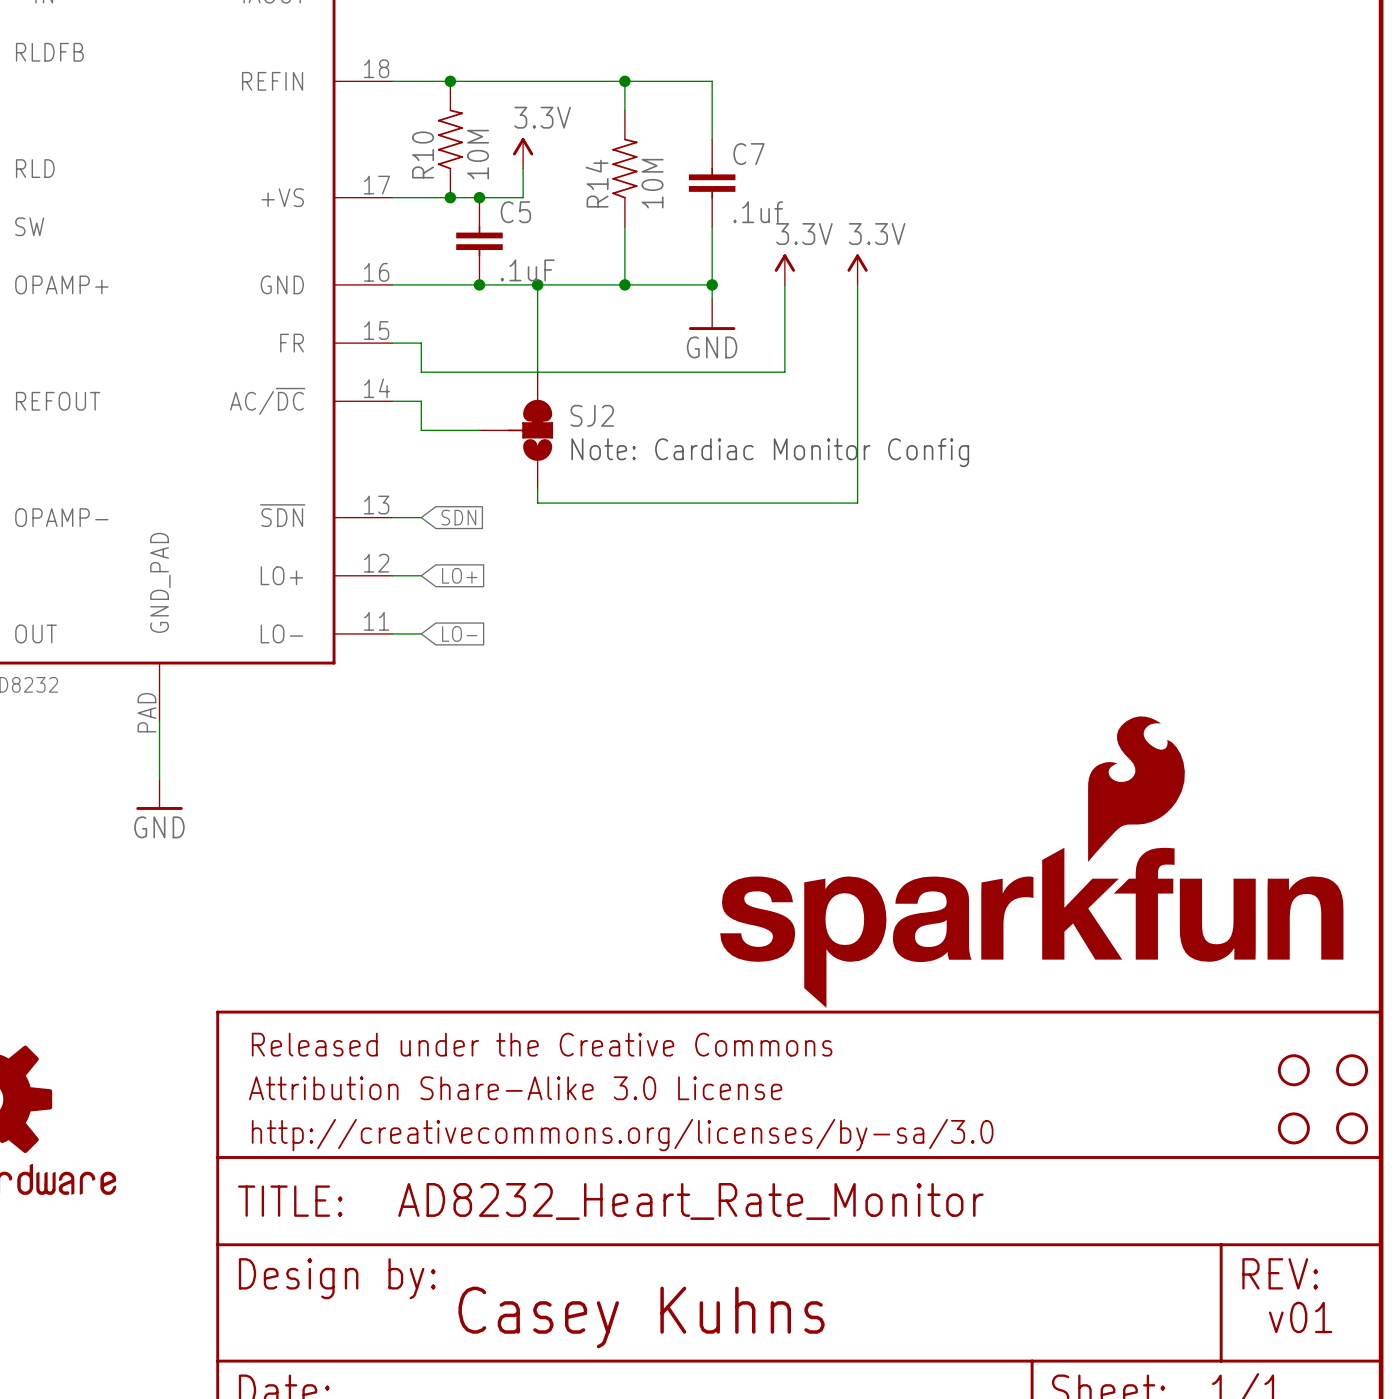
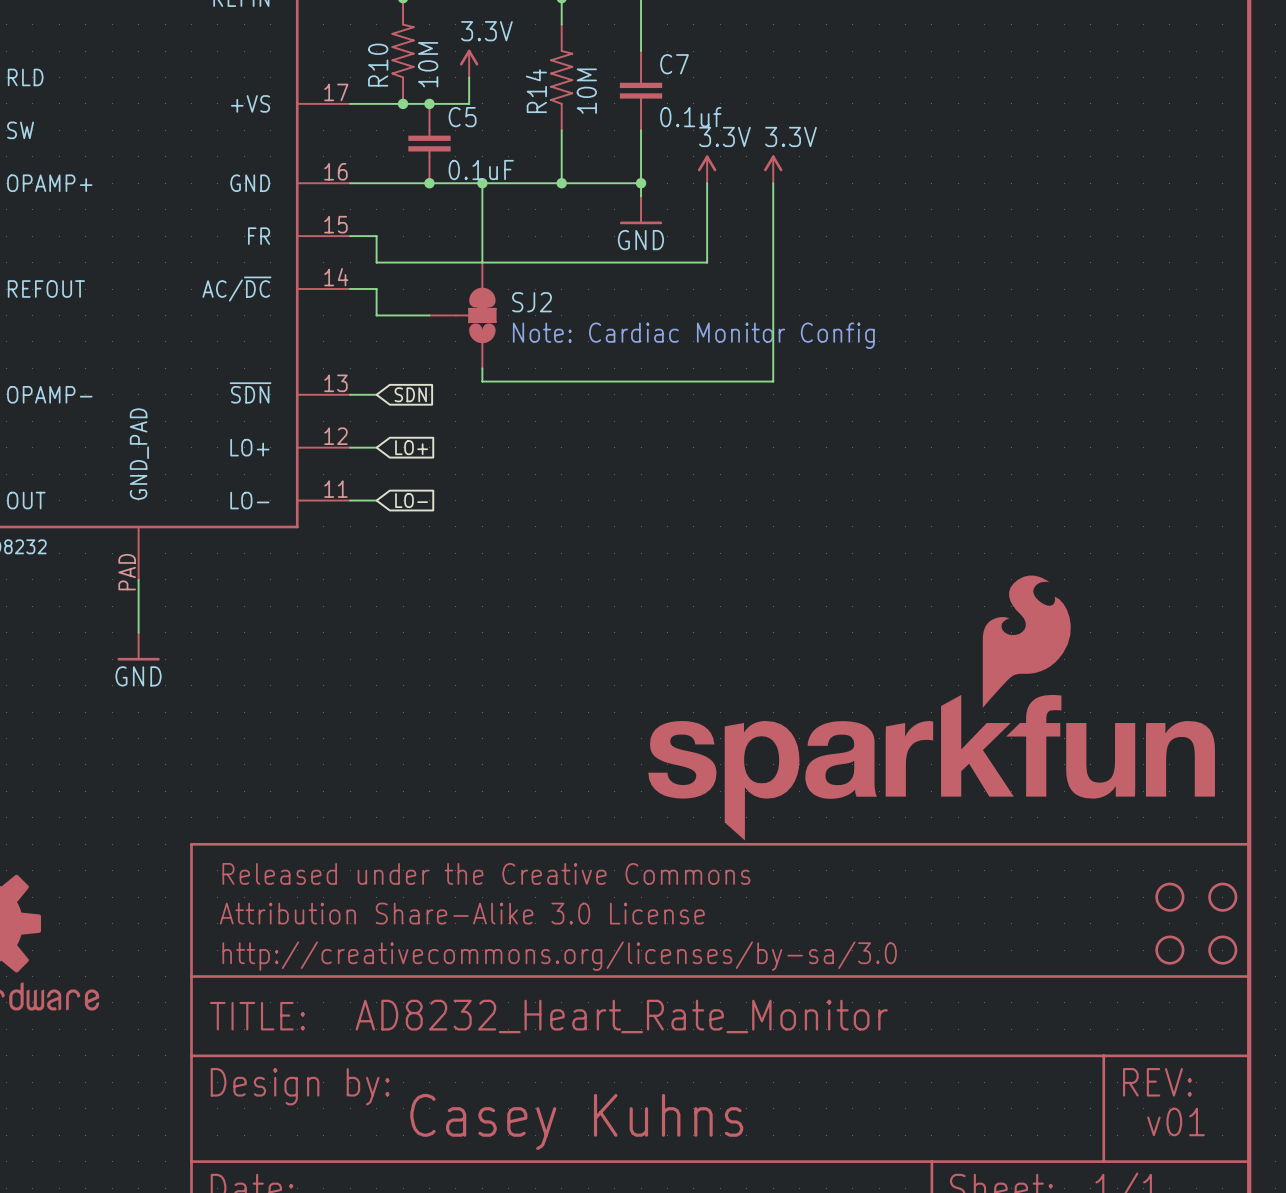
C7 value: .1uf (758, 212) -> 0.1uf (690, 117)
C5 value: .1uF (527, 270) -> 0.1uF (481, 170)

